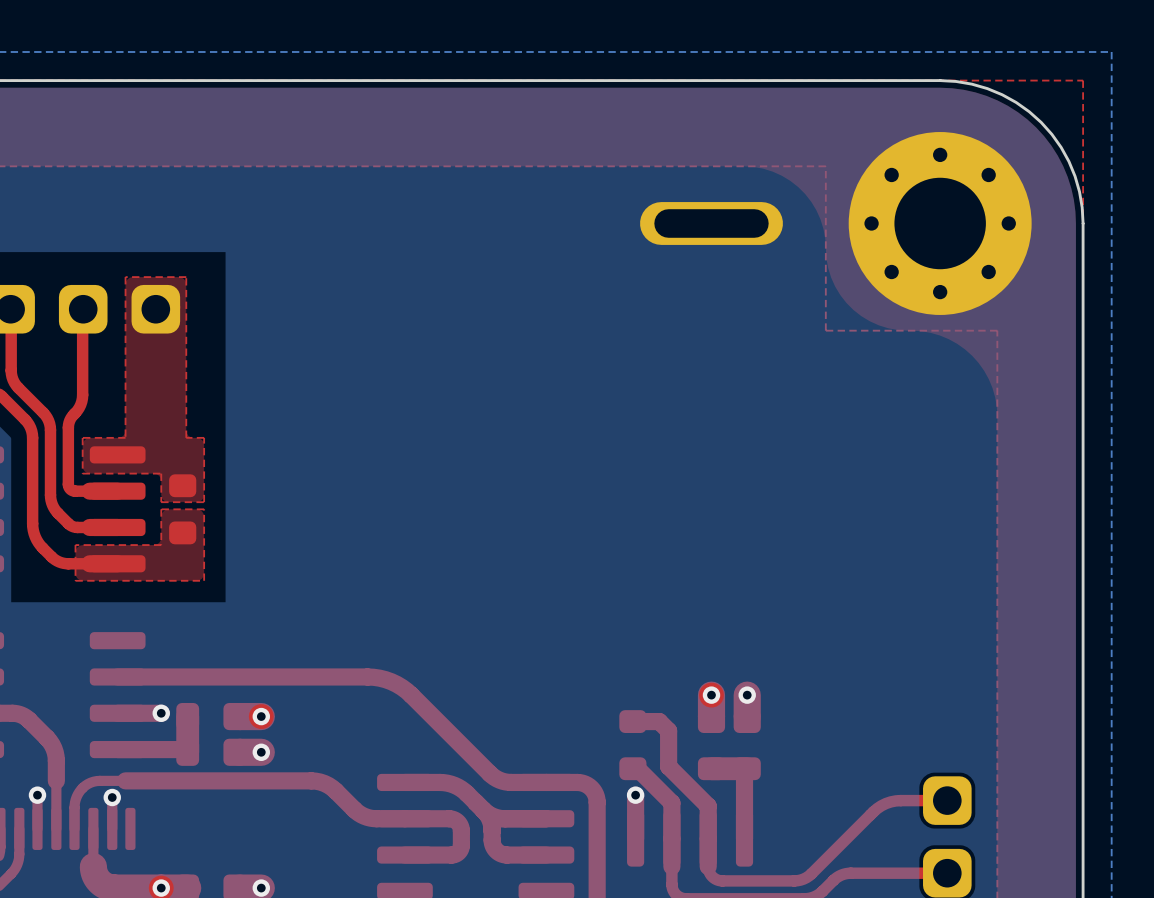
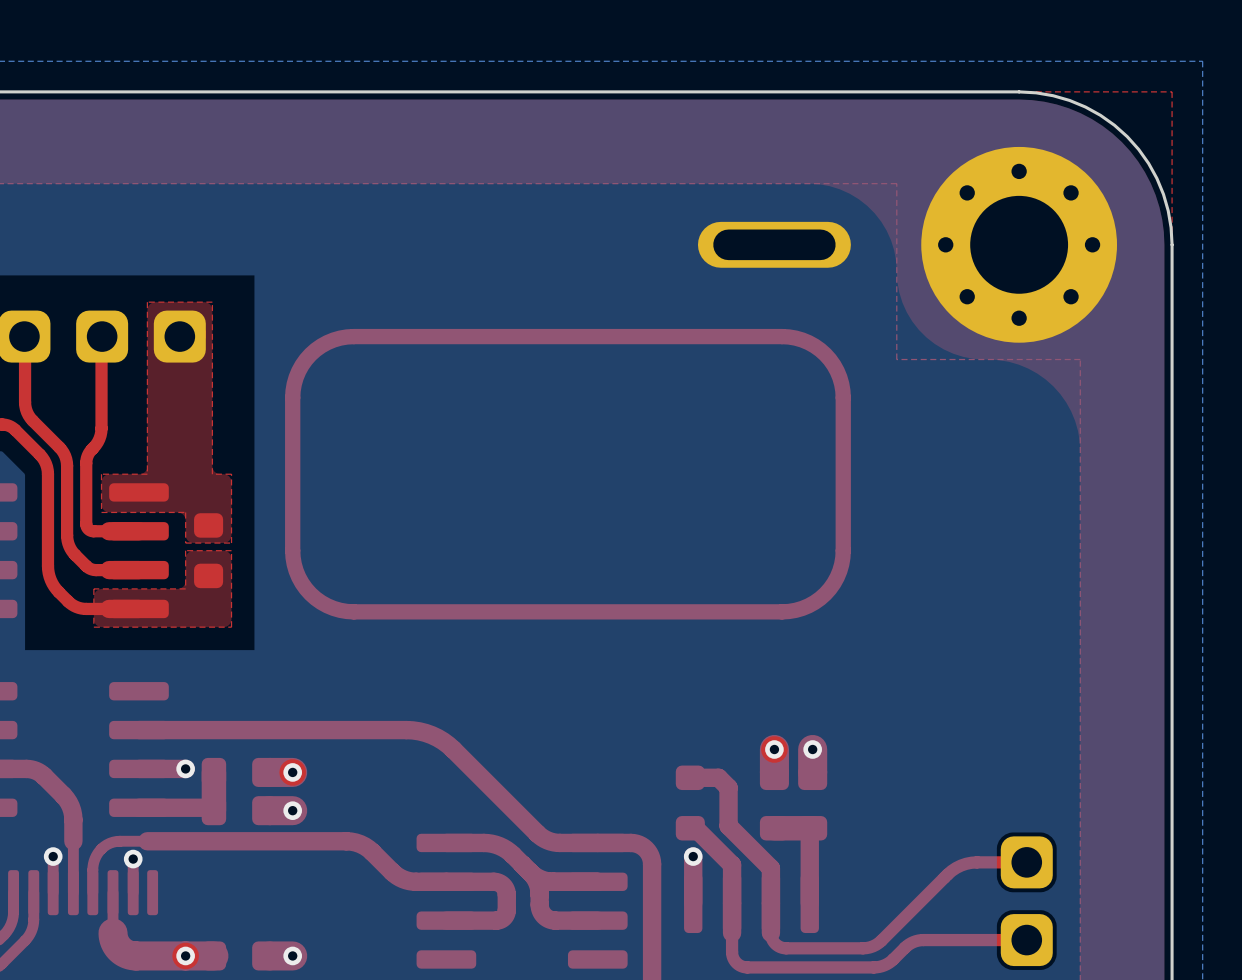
top track: none -> (782, 336) (353, 336) (340, 338) (327, 342) (315, 349) (306, 359) (296, 377) (293, 390) (292, 550) (294, 564) (298, 577) (306, 588) (321, 602) (333, 608) (353, 611) (782, 611) (795, 610) (808, 605) (820, 598) (829, 588) (839, 570) (842, 557) (842, 390) (837, 371) (829, 359) (820, 349) (802, 340) (782, 336)

